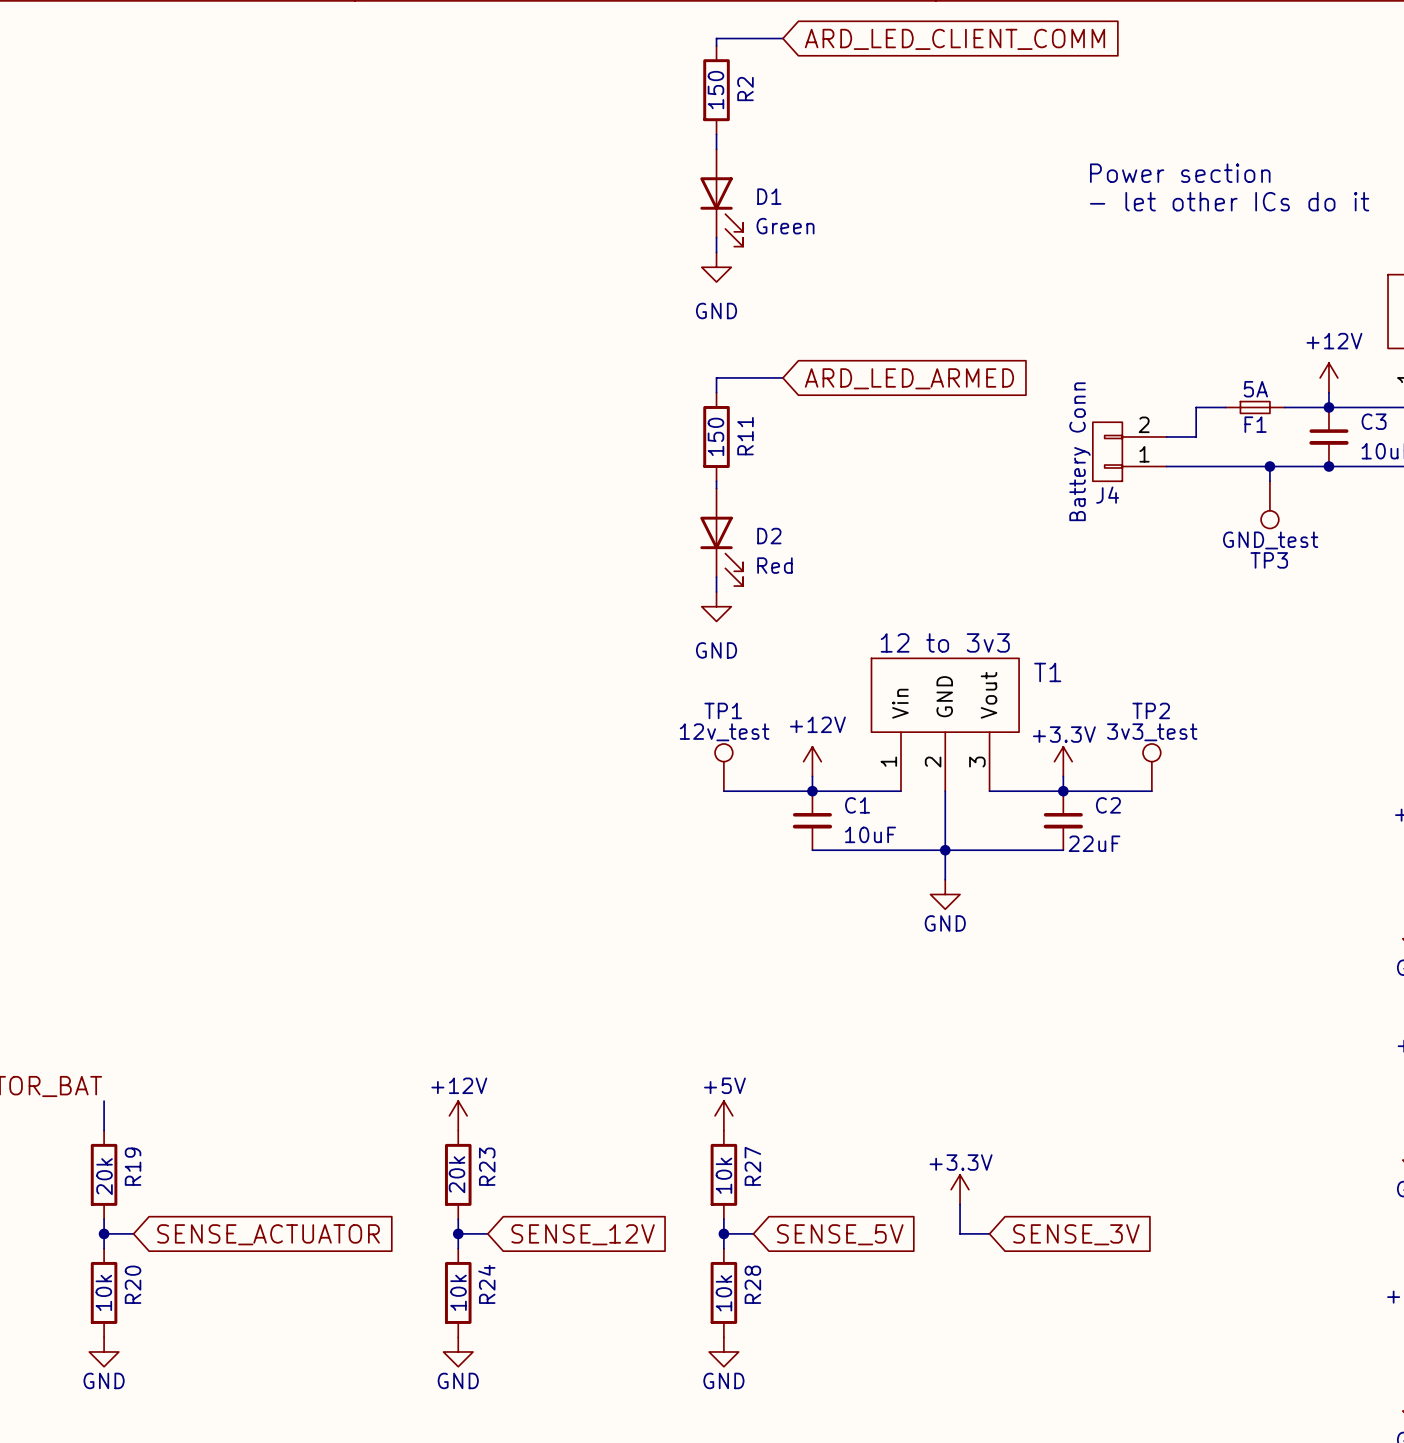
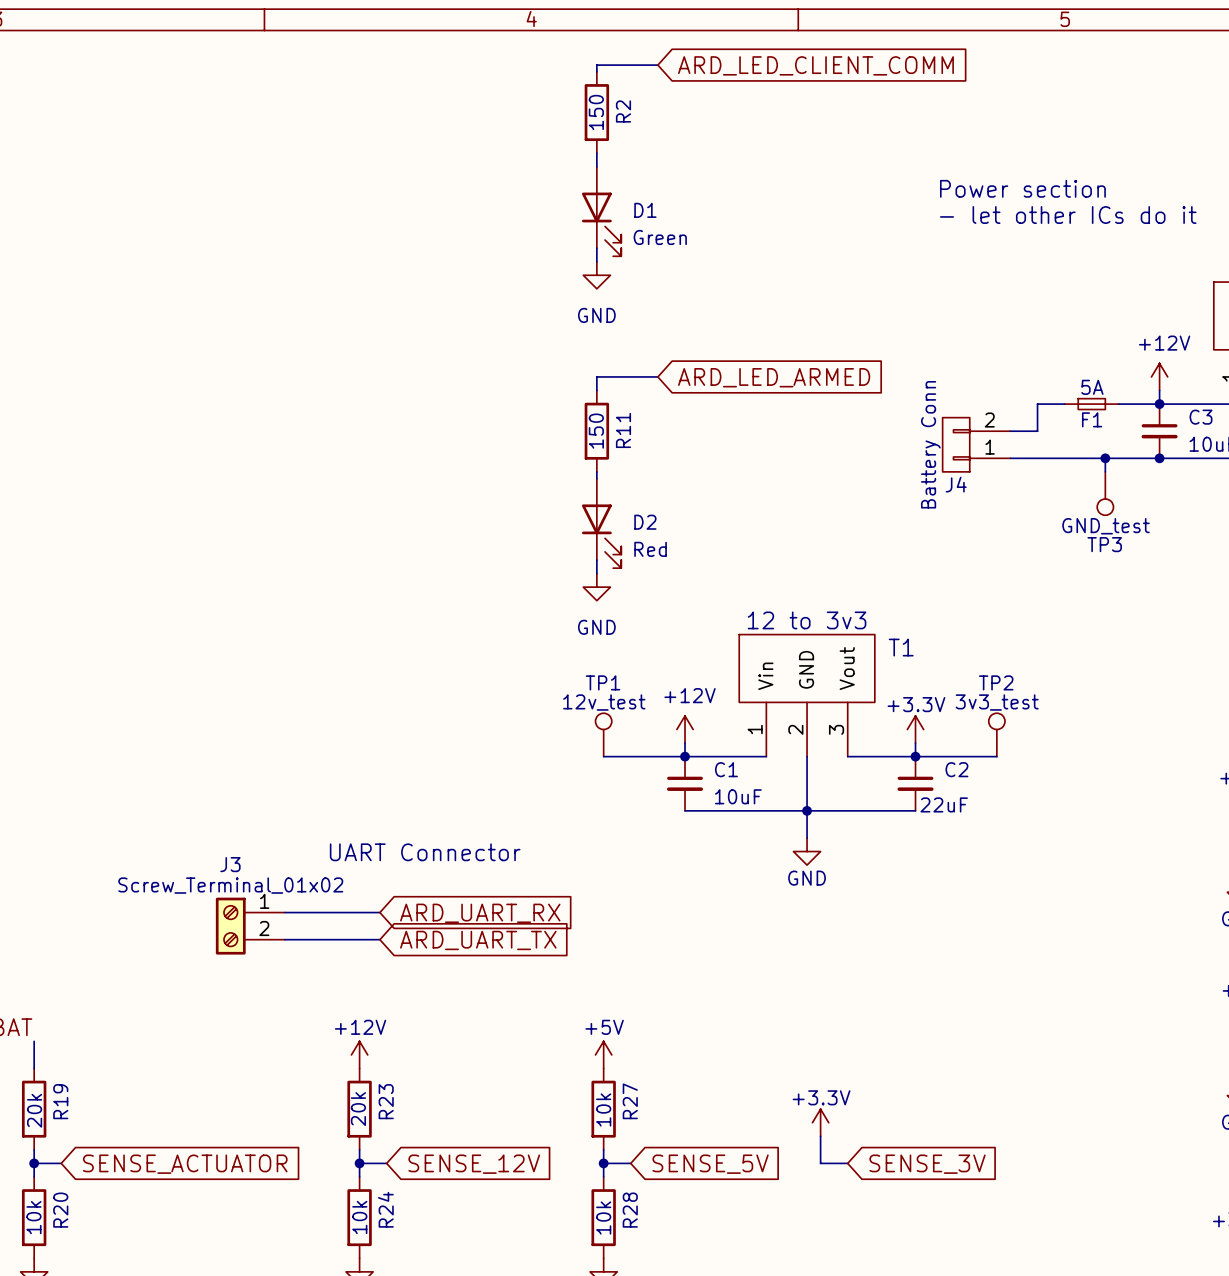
text: none -> UART Connector (425, 852)
wire: none -> (285, 912) (379, 912)
global label: none -> ARD_UART_RX (480, 913)
J3: none -> Screw_Terminal_01x02 (250, 926)
wire: none -> (285, 939) (379, 939)
global label: none -> ARD_UART_TX (478, 940)

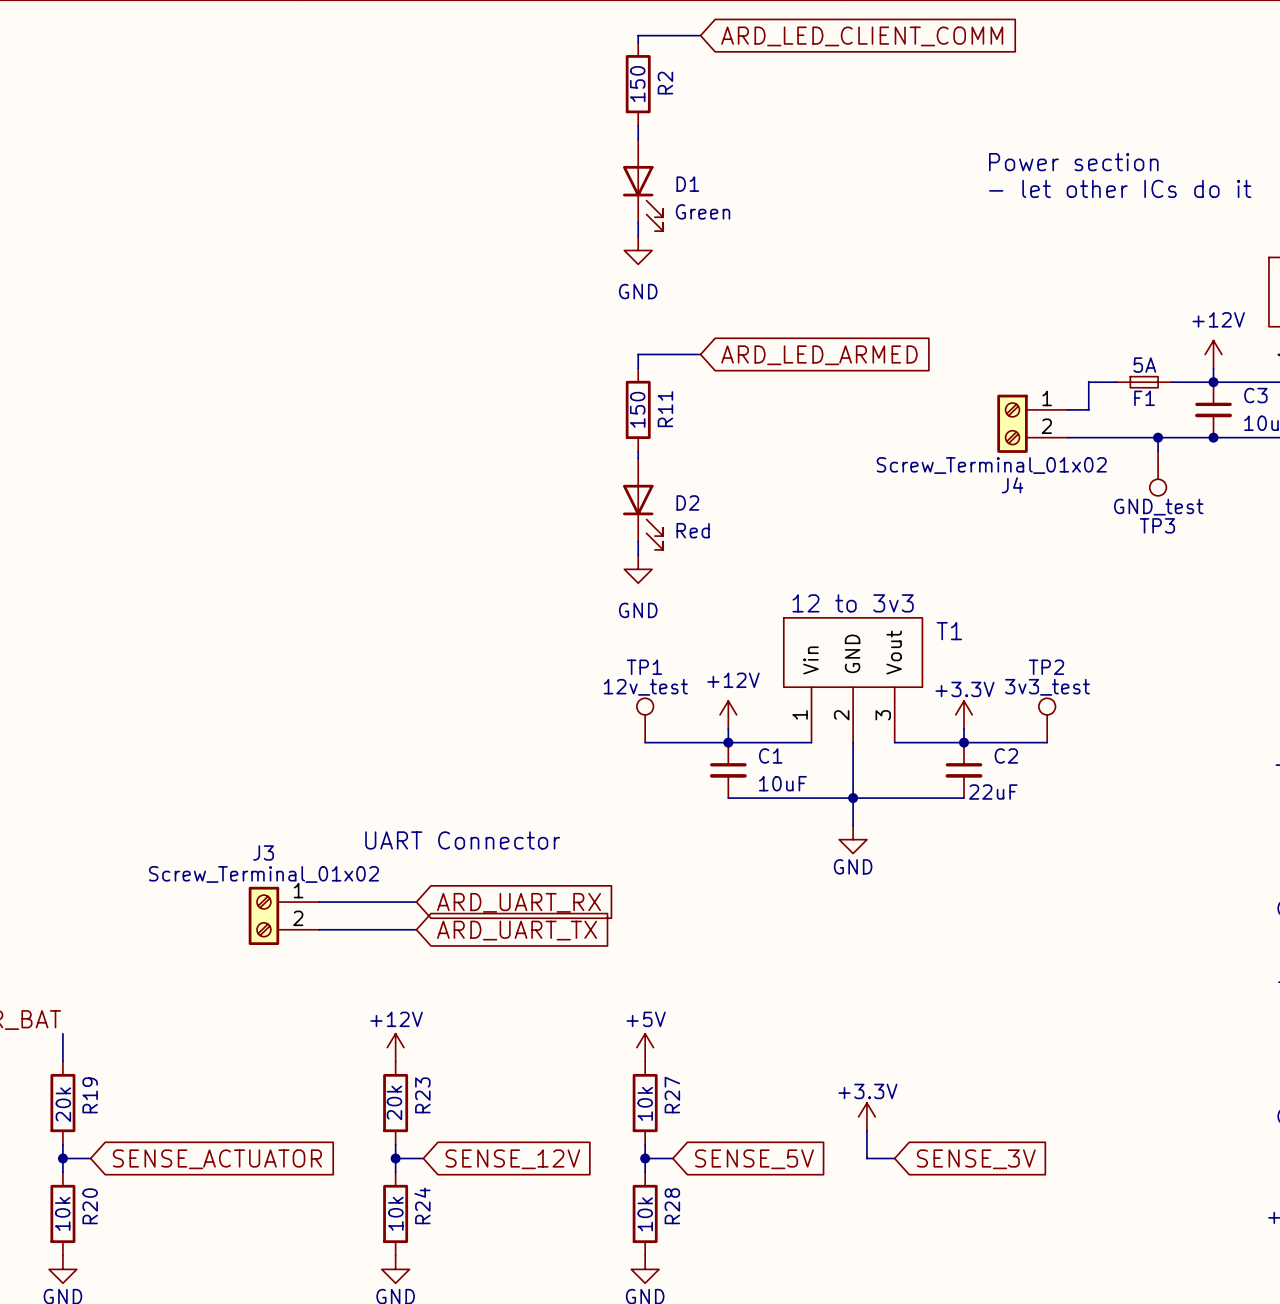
J4 symbol: [942, 417, 1011, 472] -> [997, 394, 1068, 453]
J4 value: Battery Conn (930, 444) -> Screw_Terminal_01x02 (991, 465)

